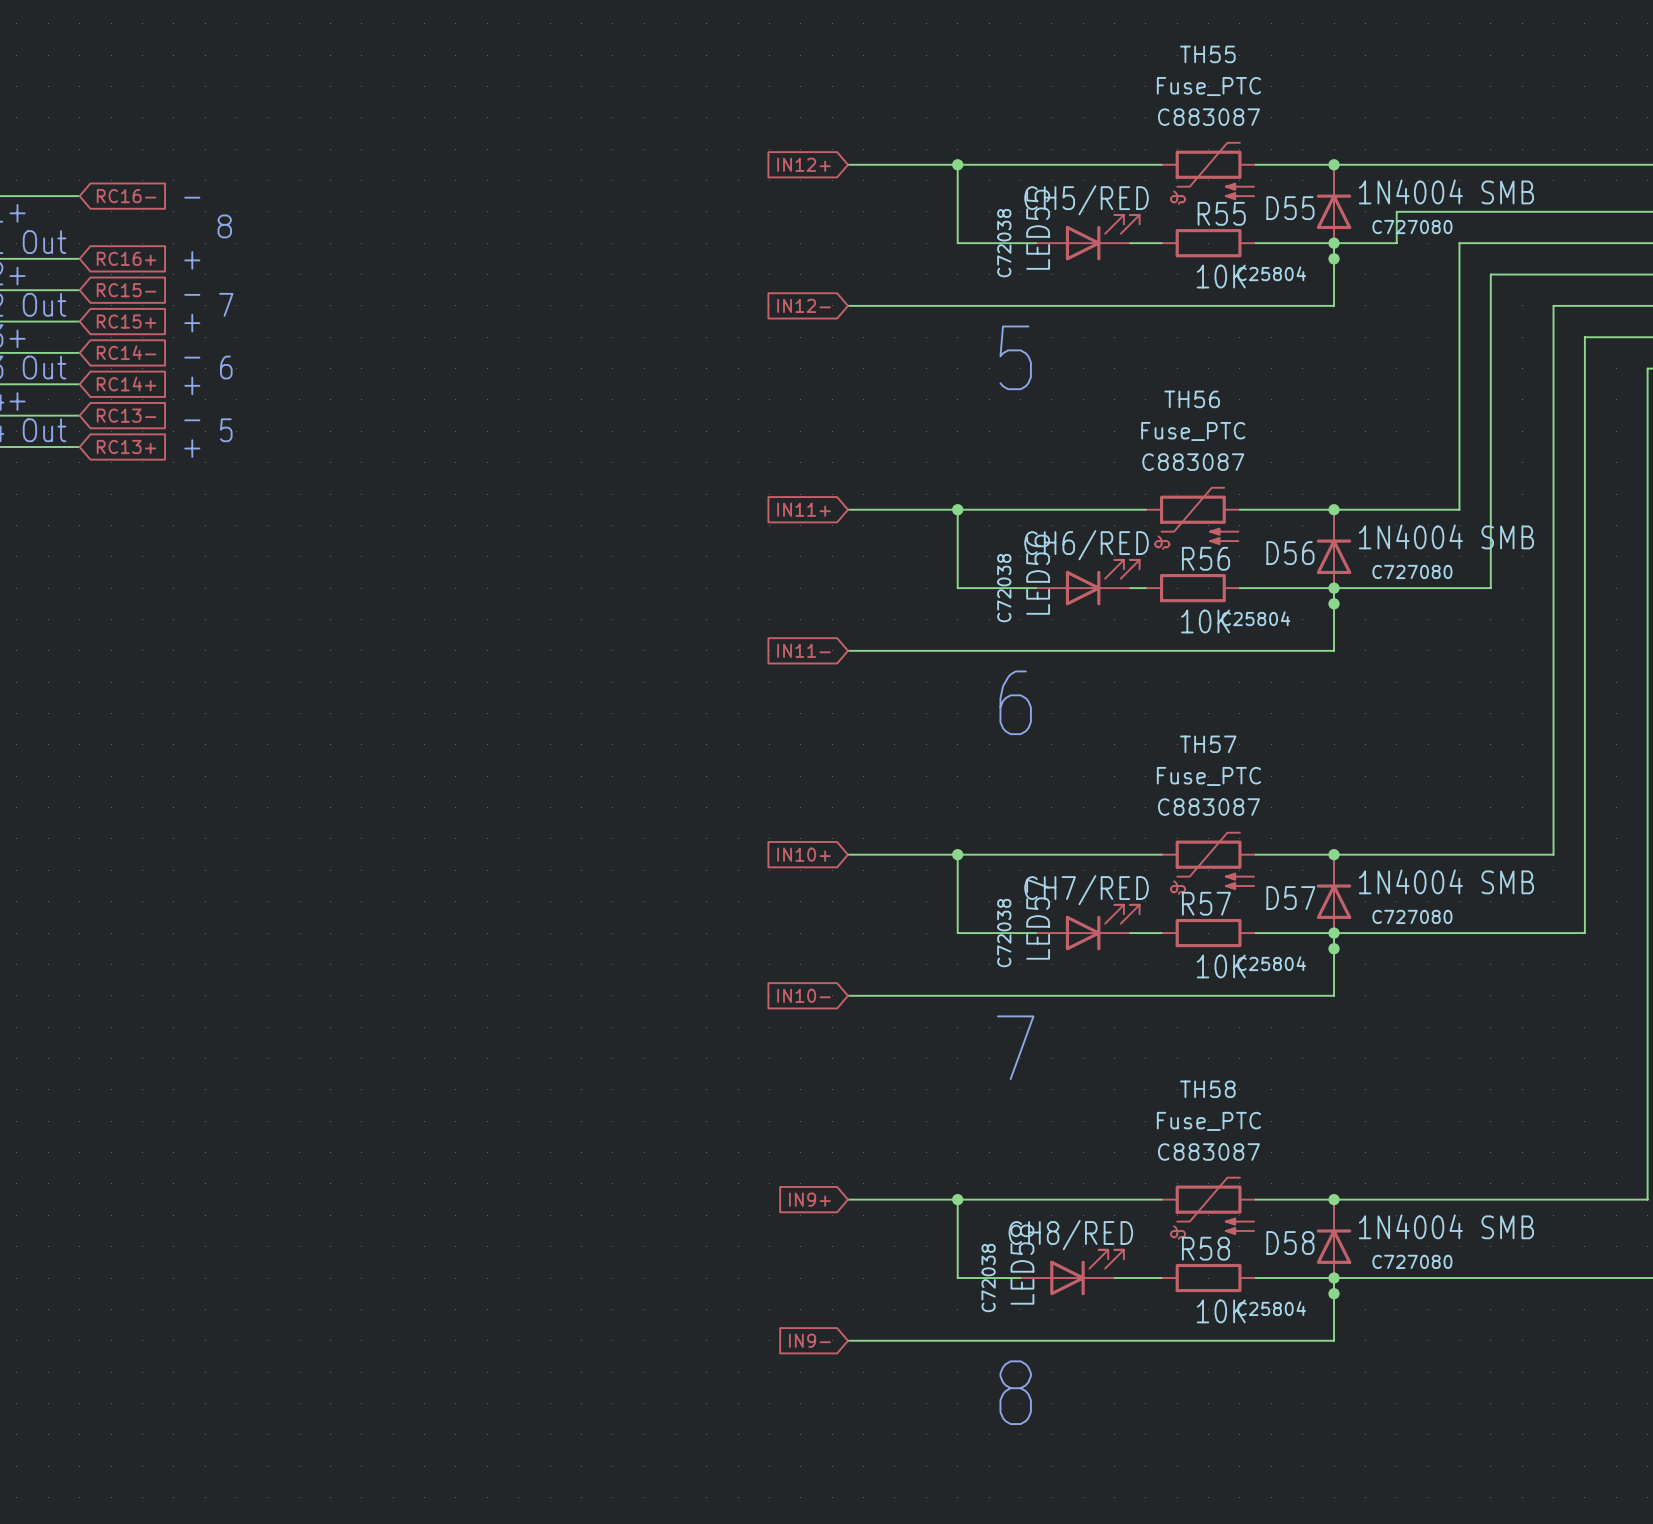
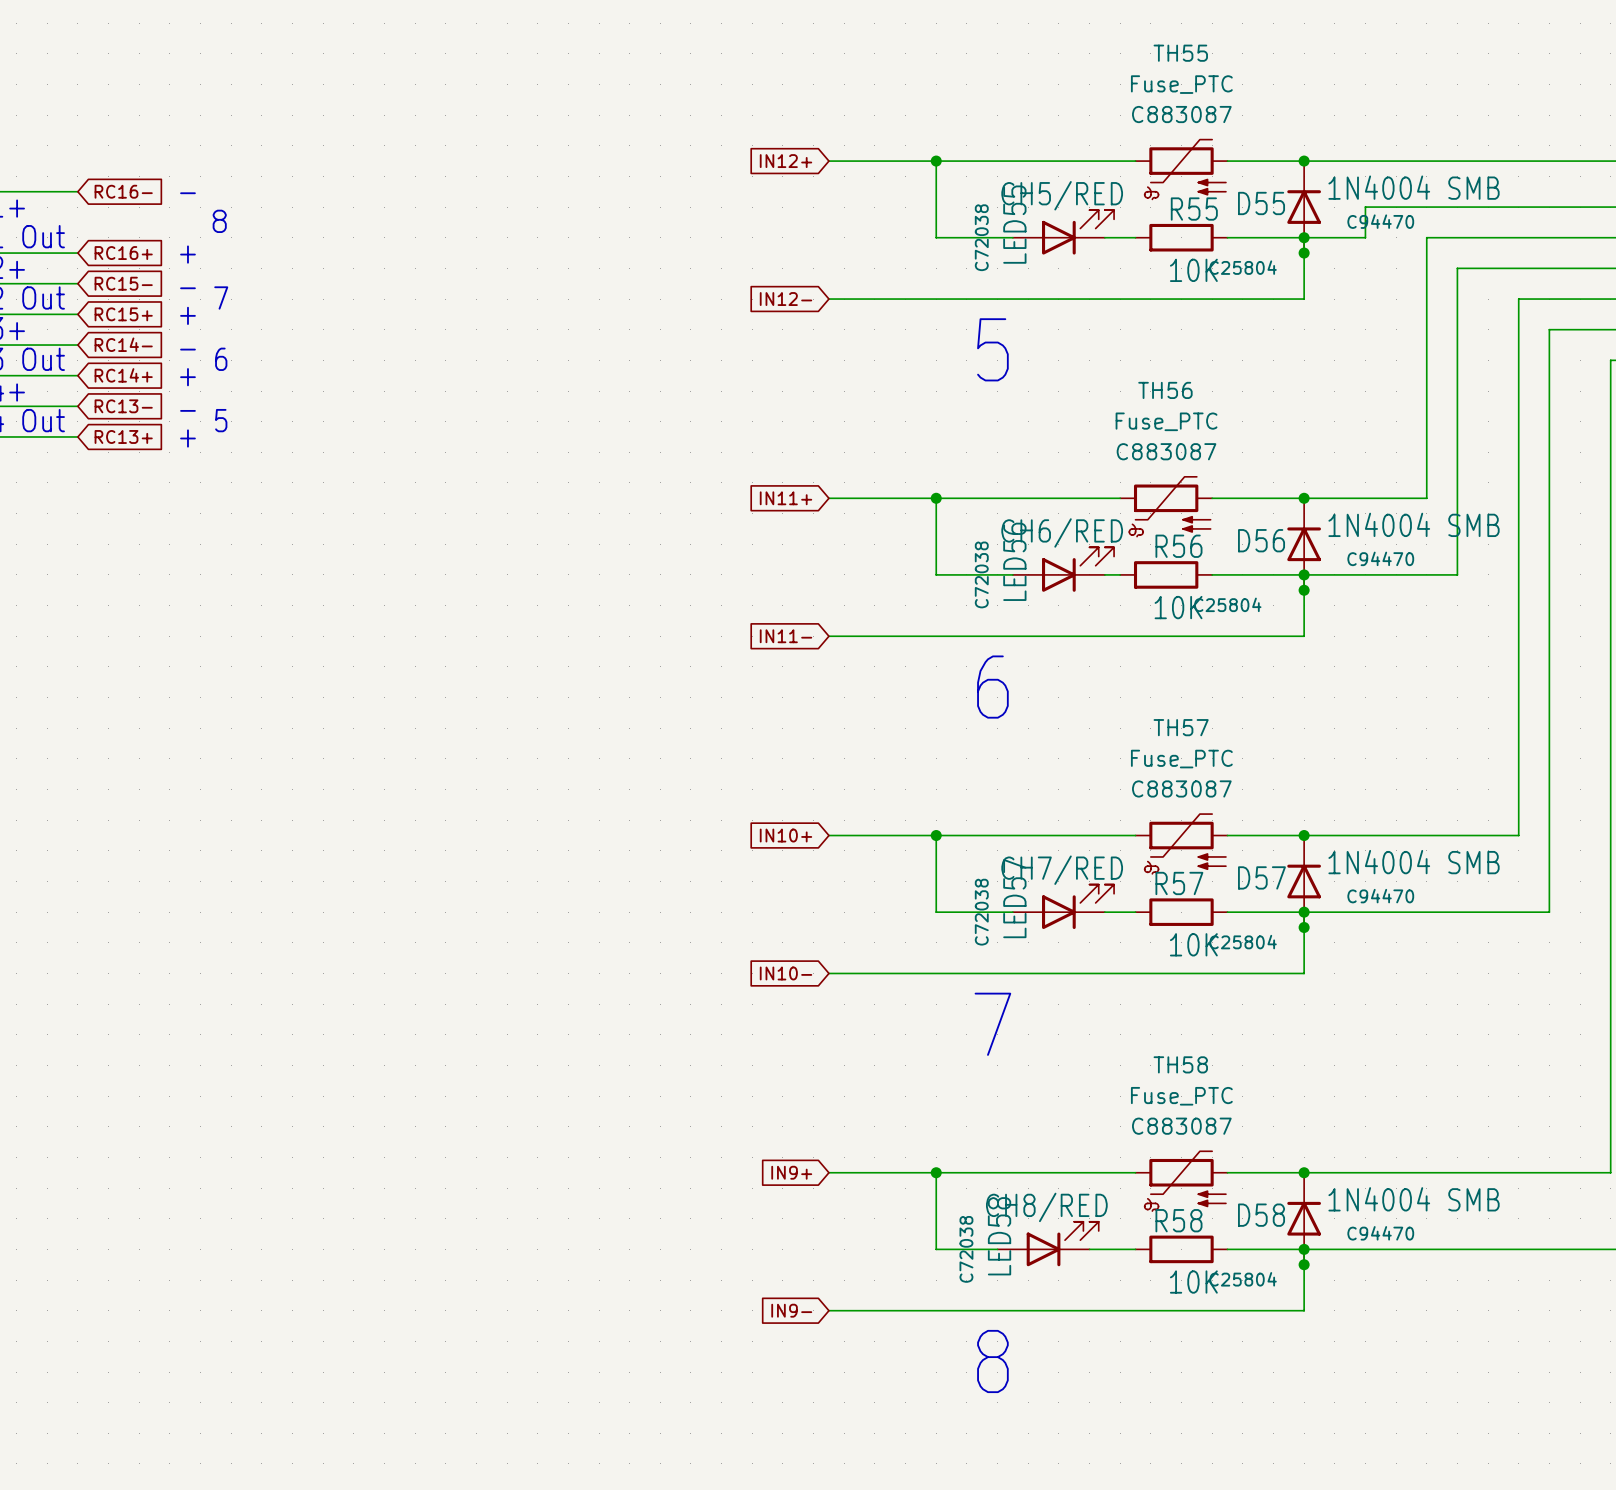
D55 text: C727080 (1412, 227) -> C94470 (1380, 221)
D56 text: C727080 (1412, 571) -> C94470 (1380, 558)
D57 text: C727080 (1412, 916) -> C94470 (1380, 896)
D58 text: C727080 (1412, 1261) -> C94470 (1380, 1233)

